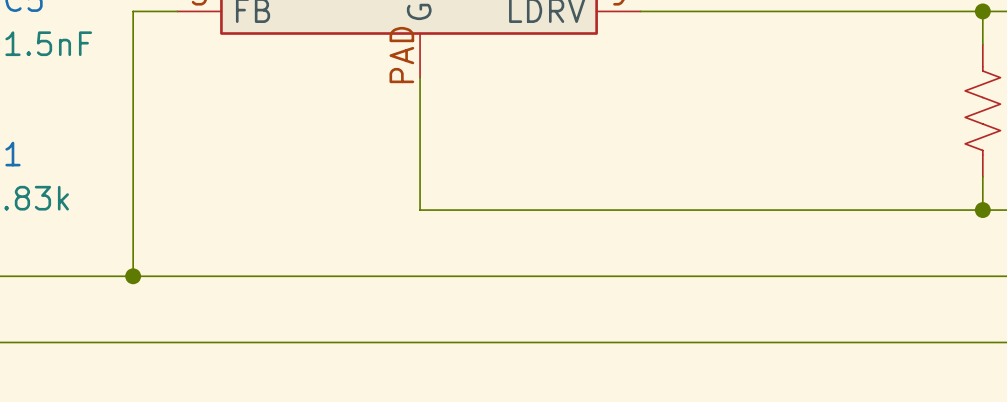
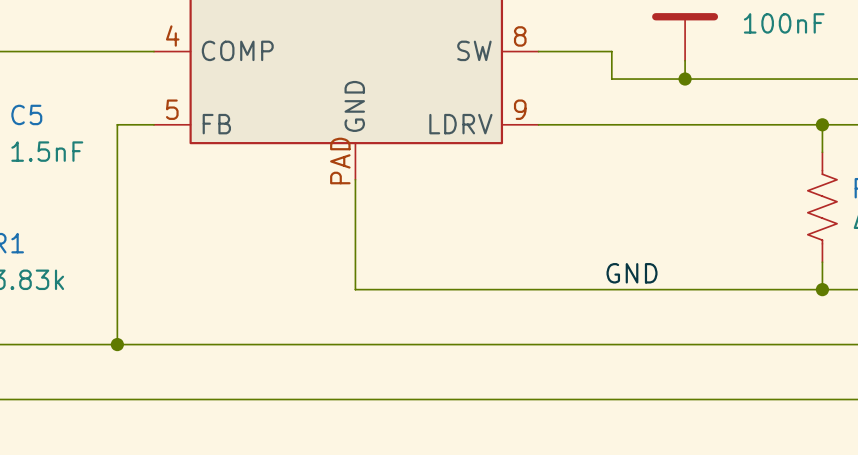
label: none -> GND (632, 273)

